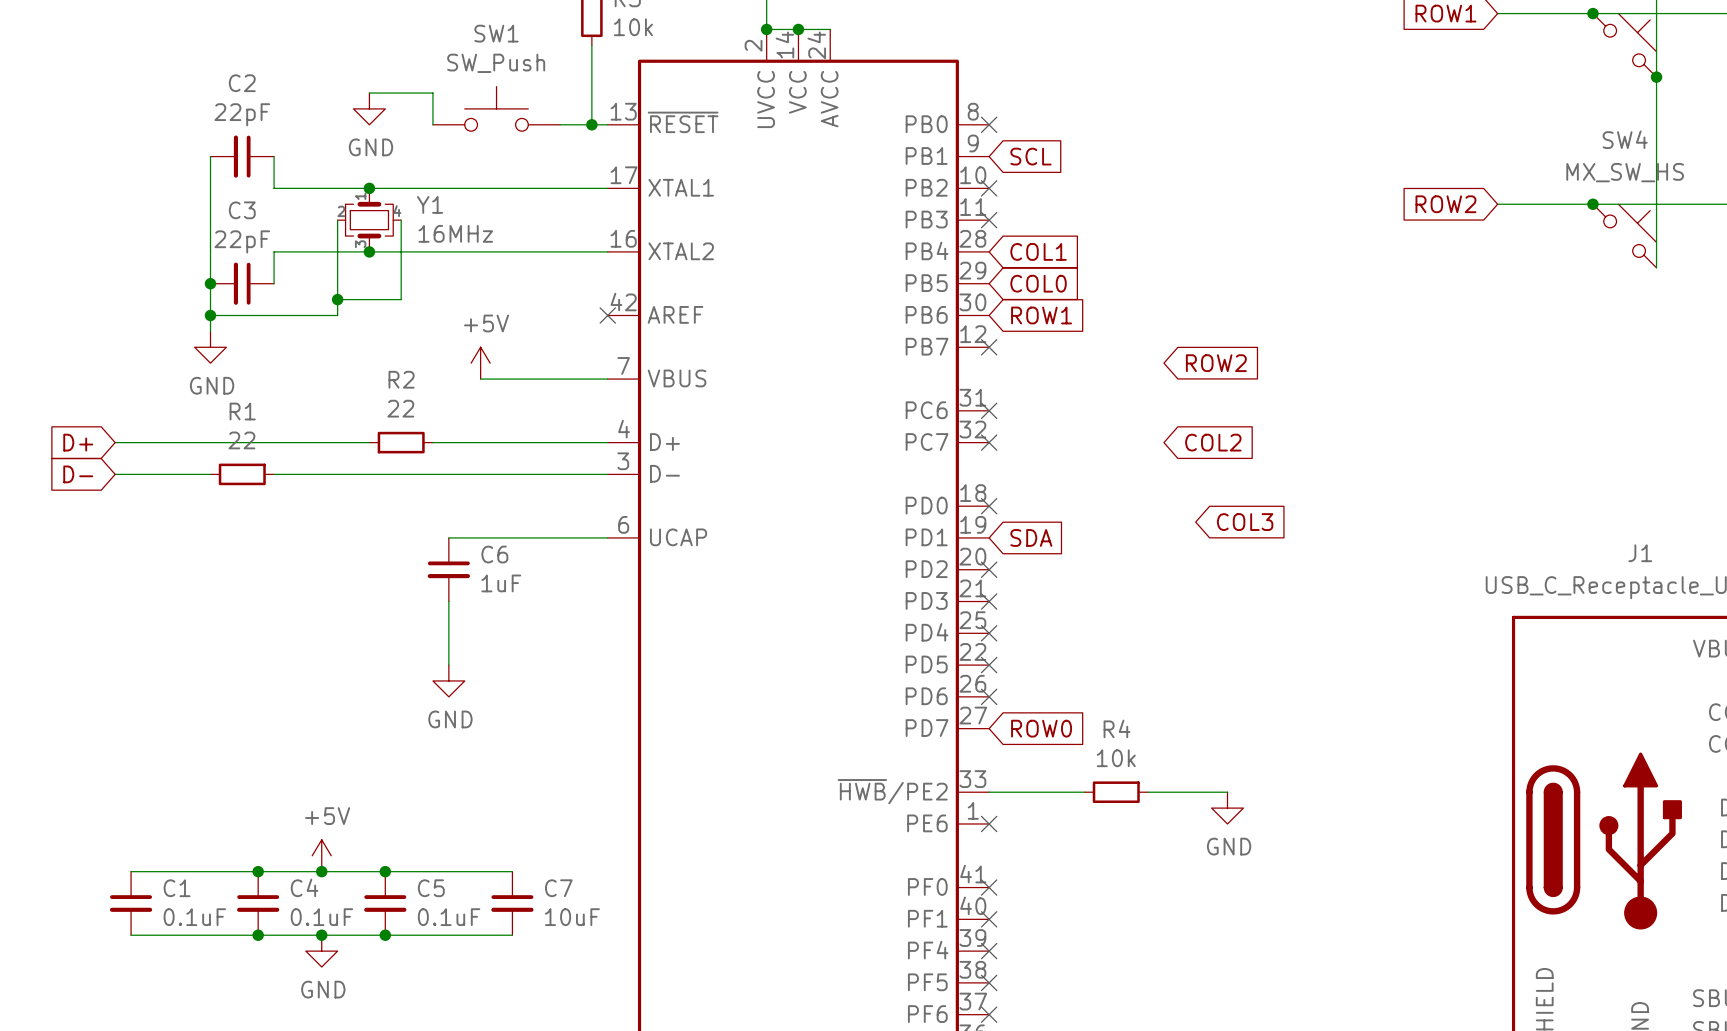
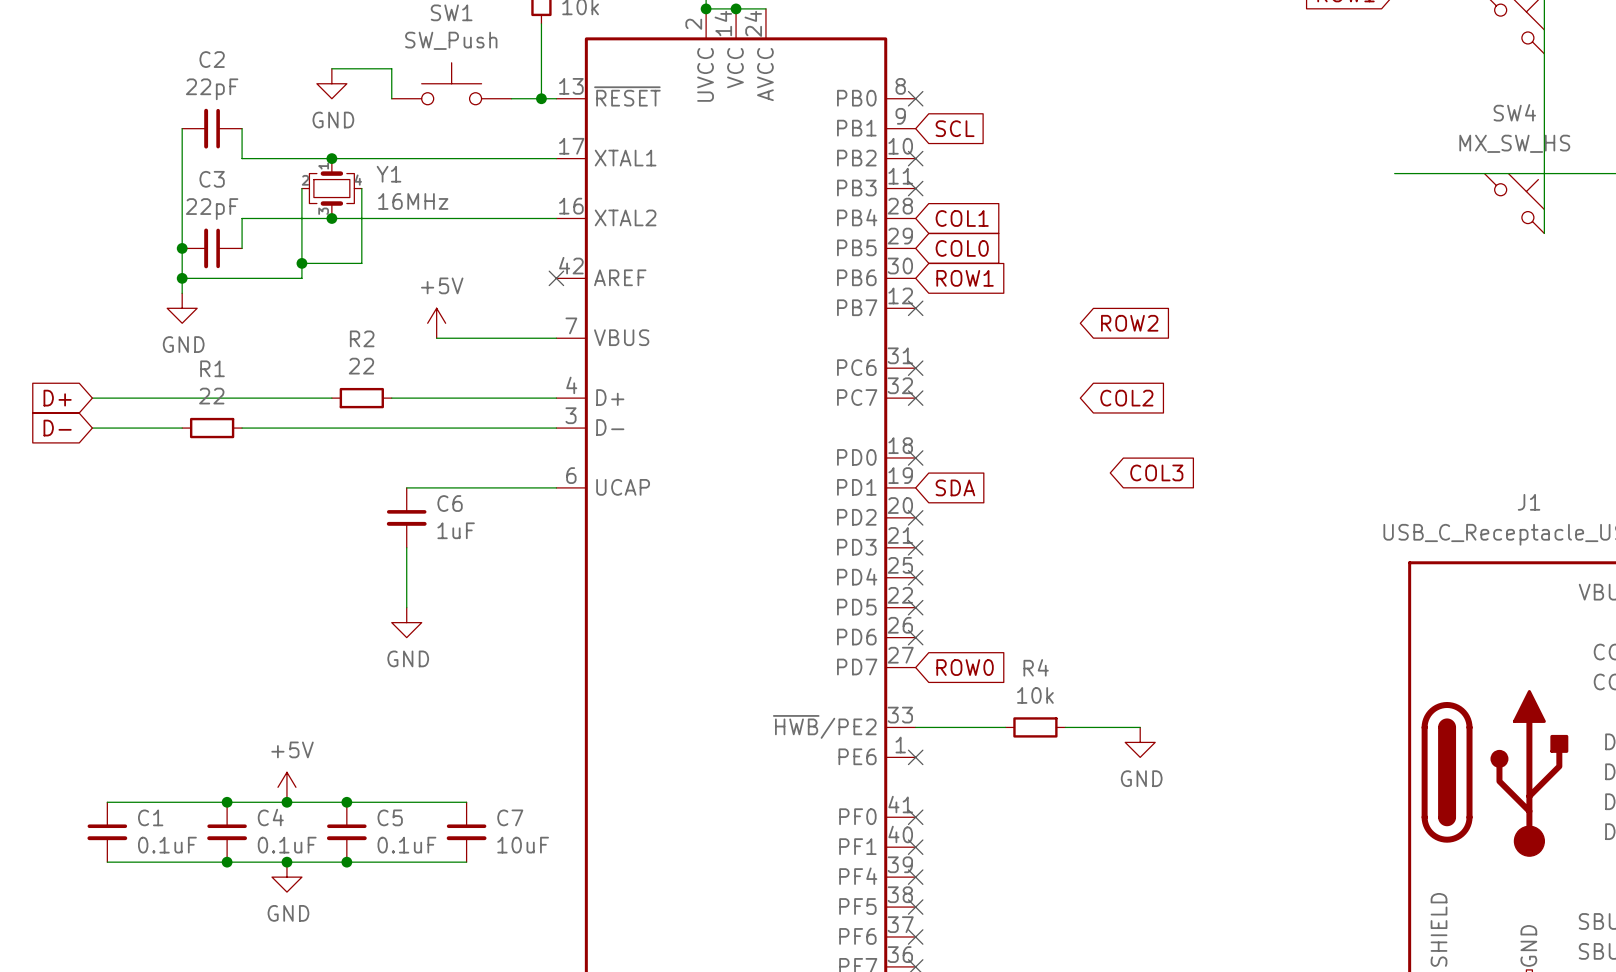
junction: (1656, 77) -> none
global label: ROW2 (1445, 204) -> none
junction: (1592, 204) -> none

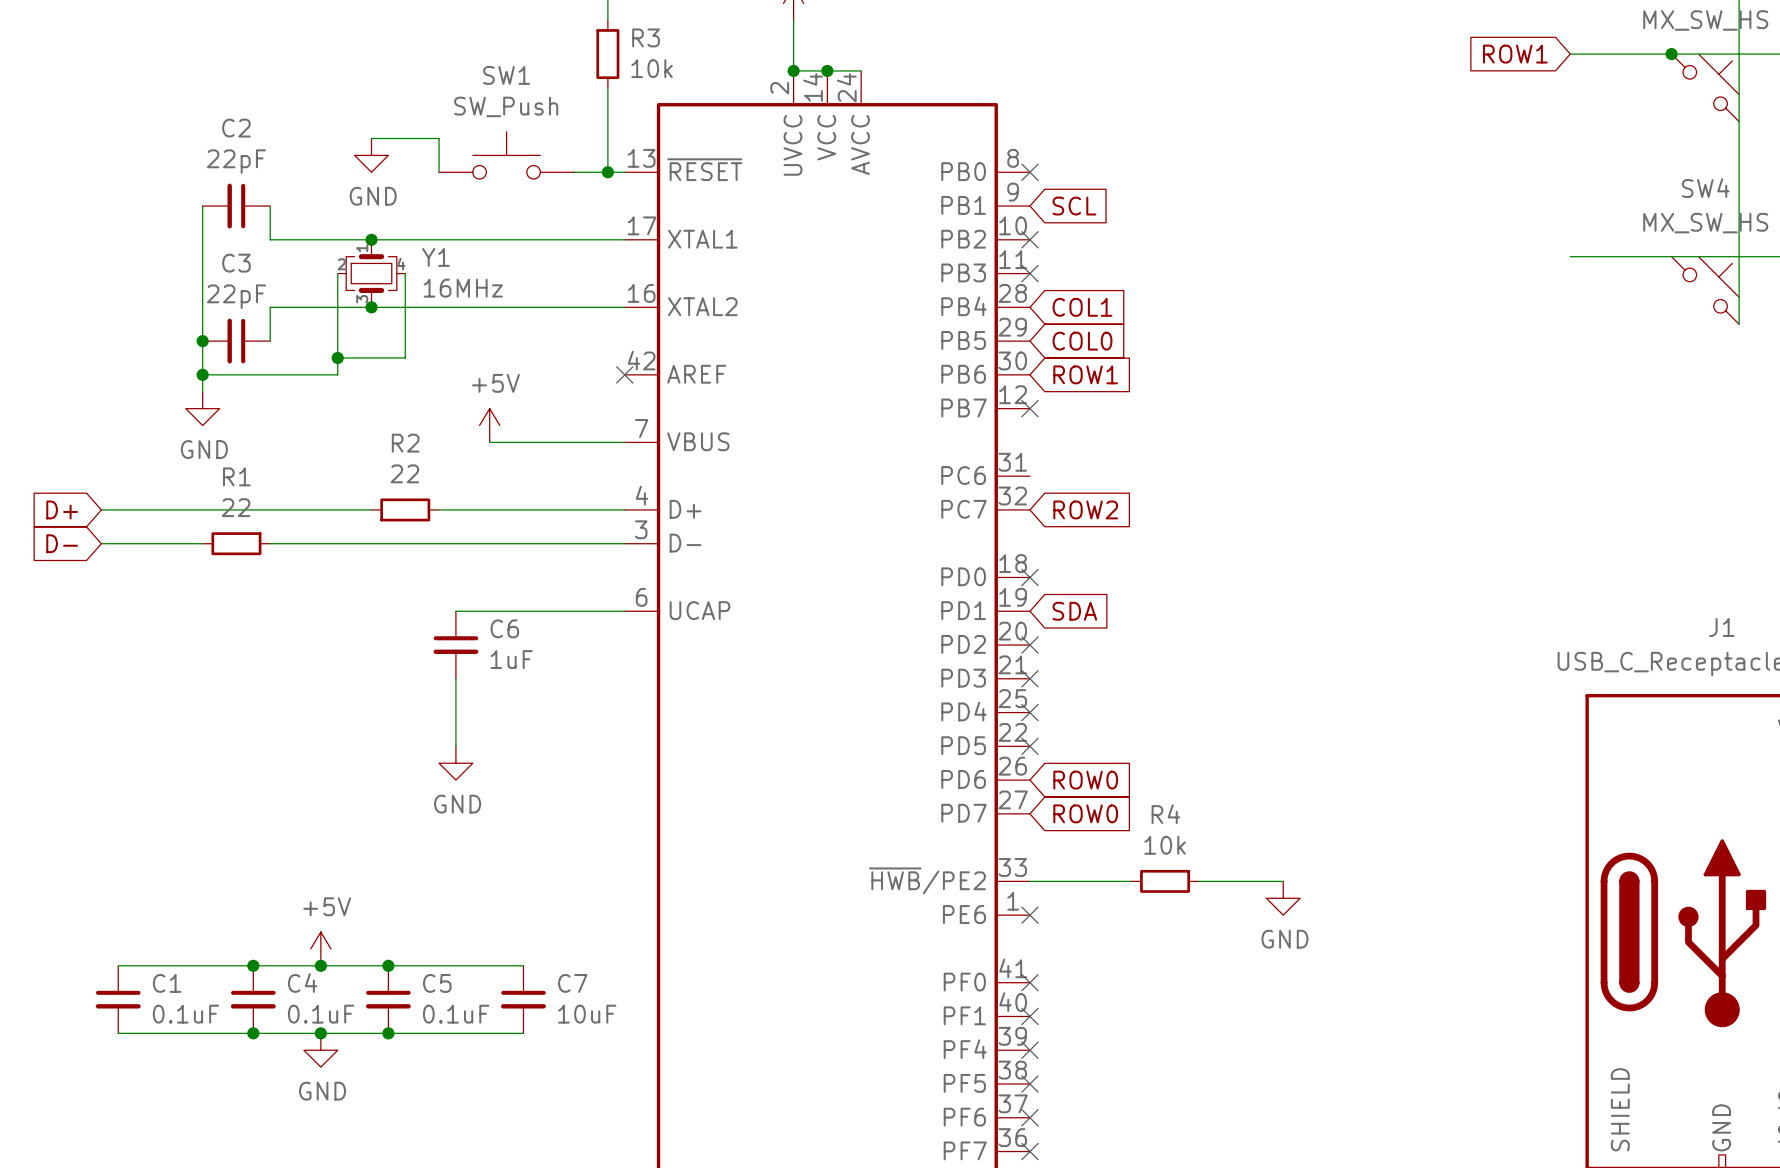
global label position: ROW2 (1129, 323) -> ROW2 (1085, 509)
no-connect mark: (915, 368) -> none
no-connect mark: (915, 398) -> none
global label: COL2 (1126, 398) -> none
global label: COL3 (1156, 472) -> none
no-connect mark: (915, 637) -> none
global label: none -> ROW0 (1085, 780)

